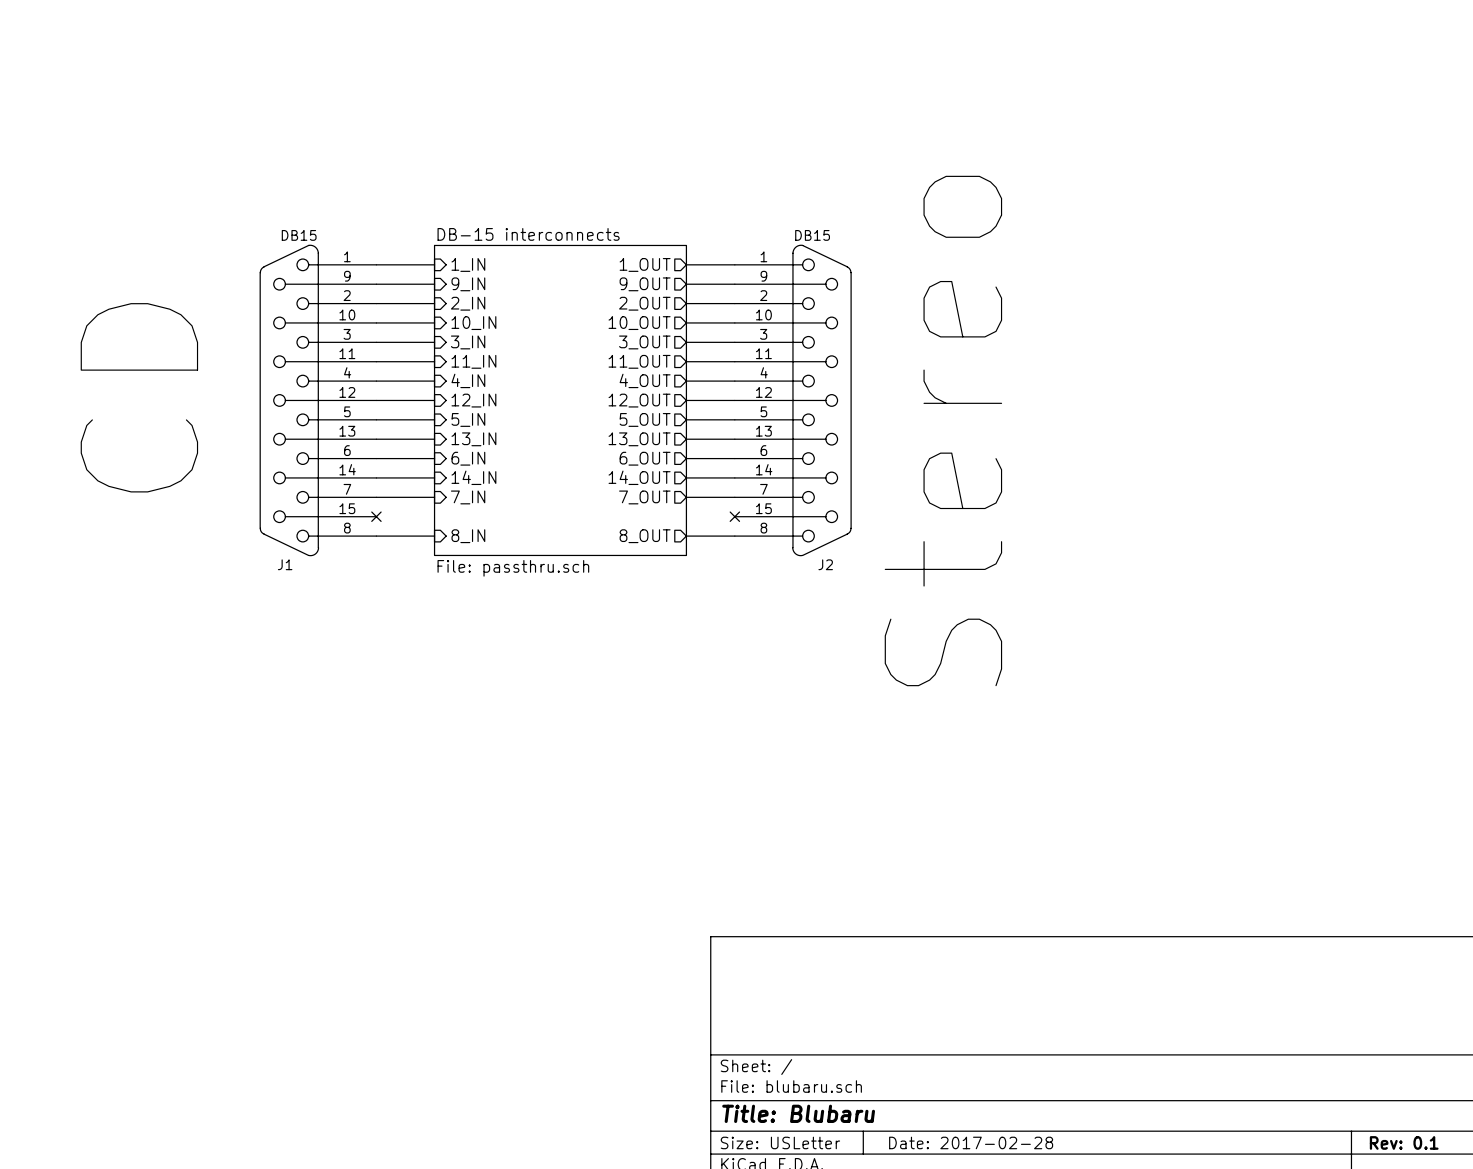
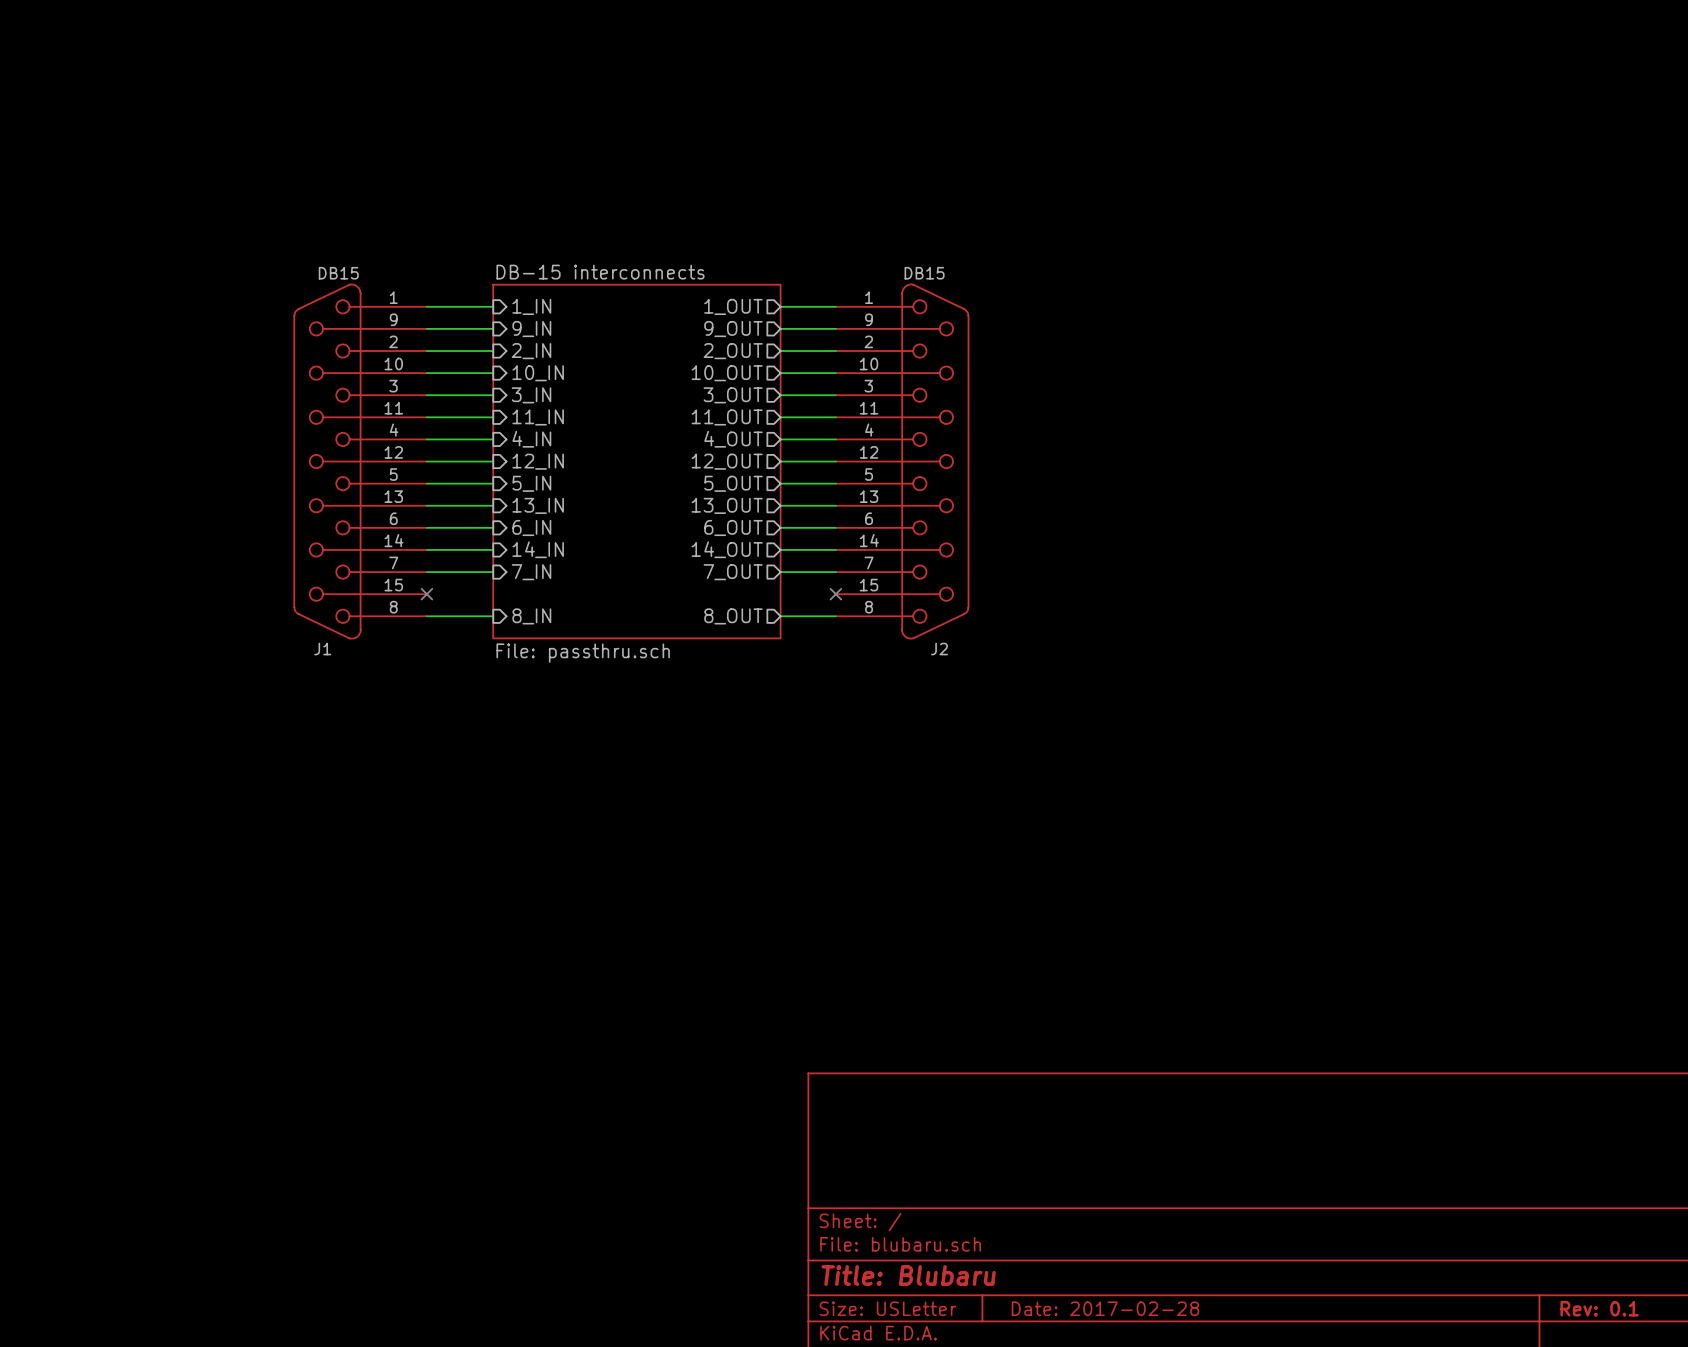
text: CD (139, 397) -> none
text: Stereo (943, 431) -> none

